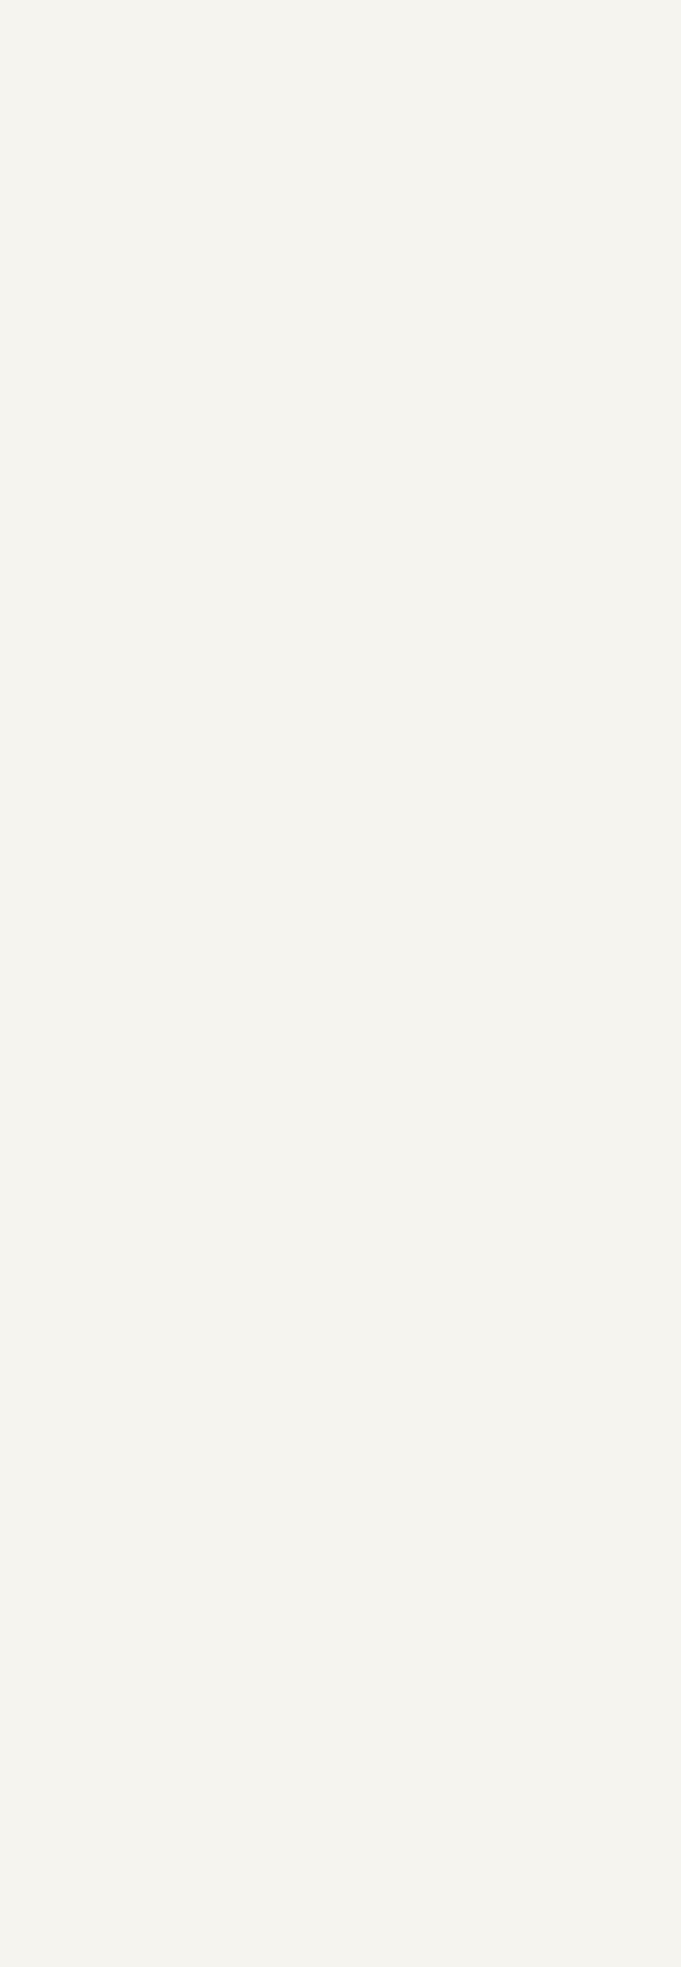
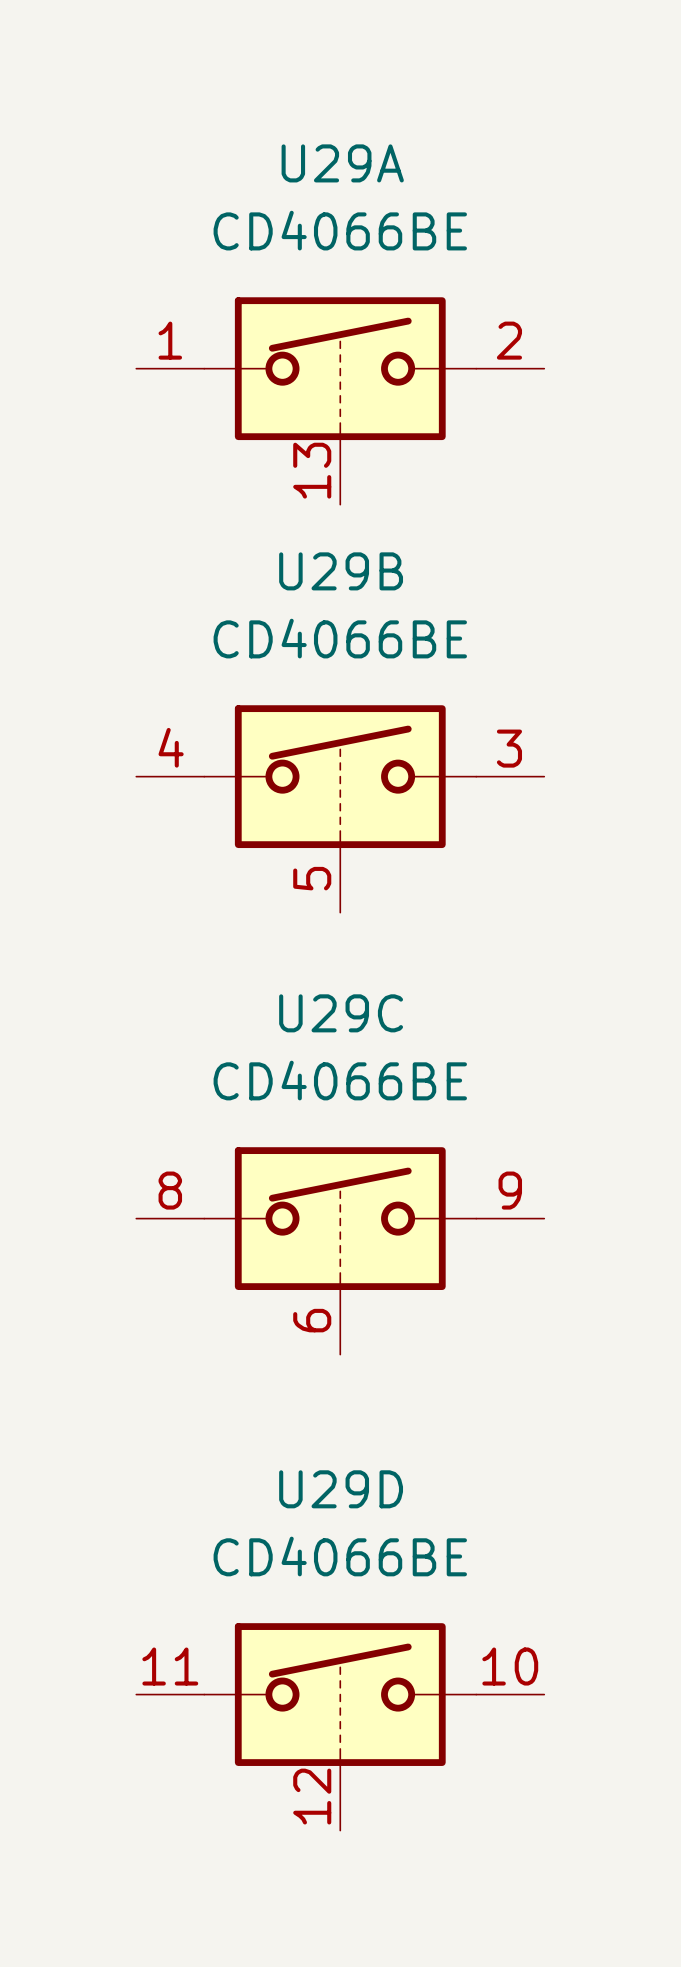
U29A: none -> CD4066BE (340, 400)
U29B: none -> CD4066BE (340, 808)
U29C: none -> CD4066BE (340, 1250)
U29D: none -> CD4066BE (340, 1726)

